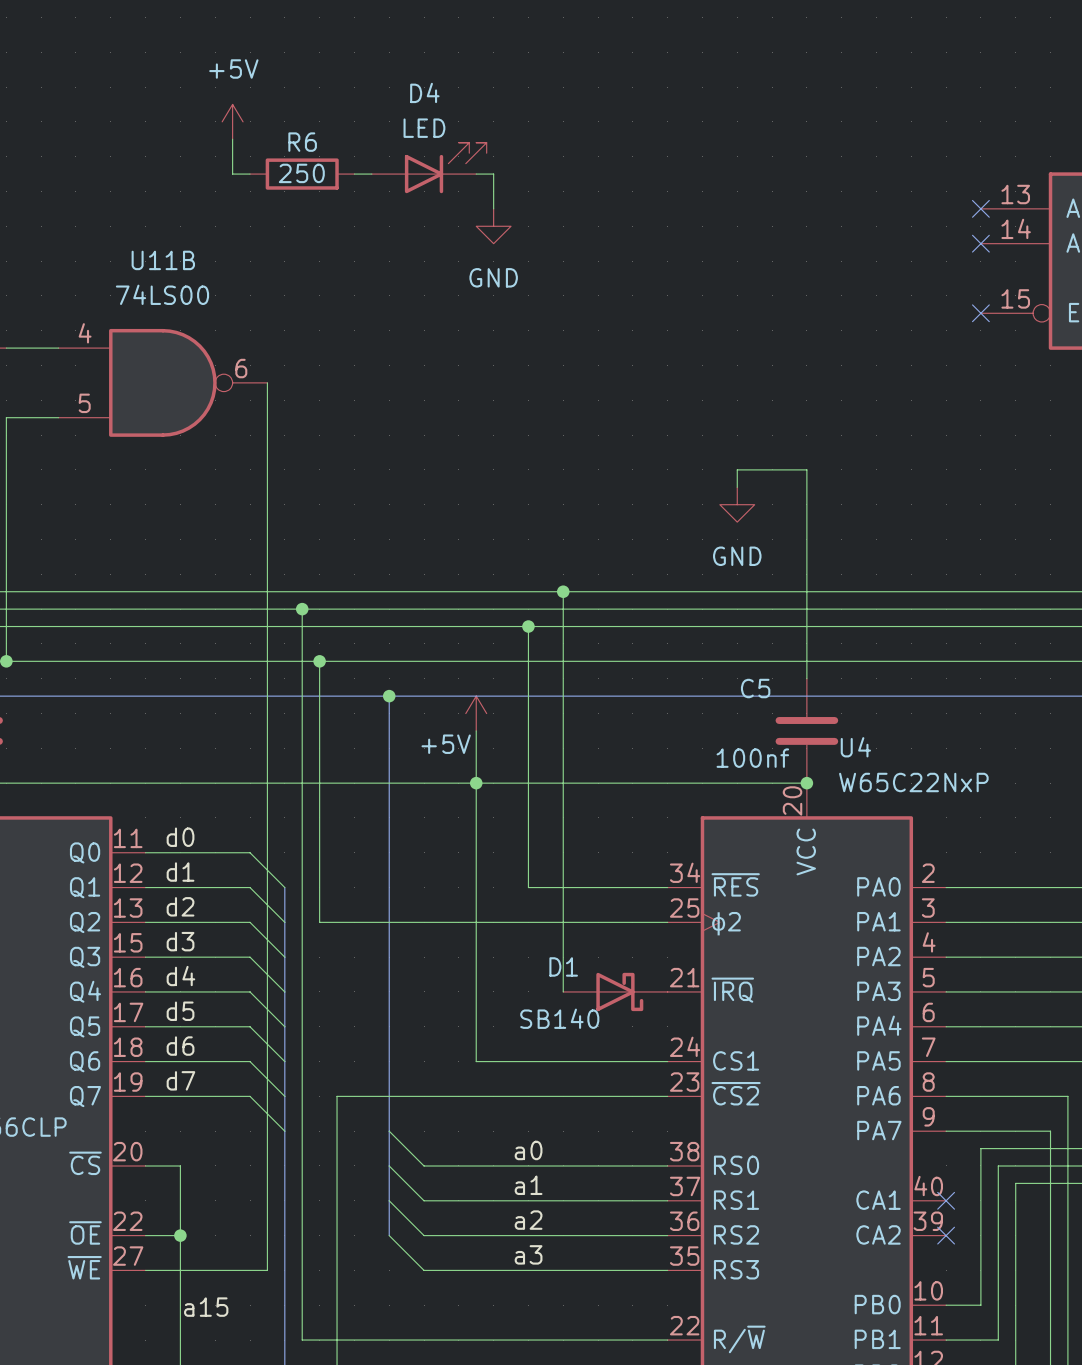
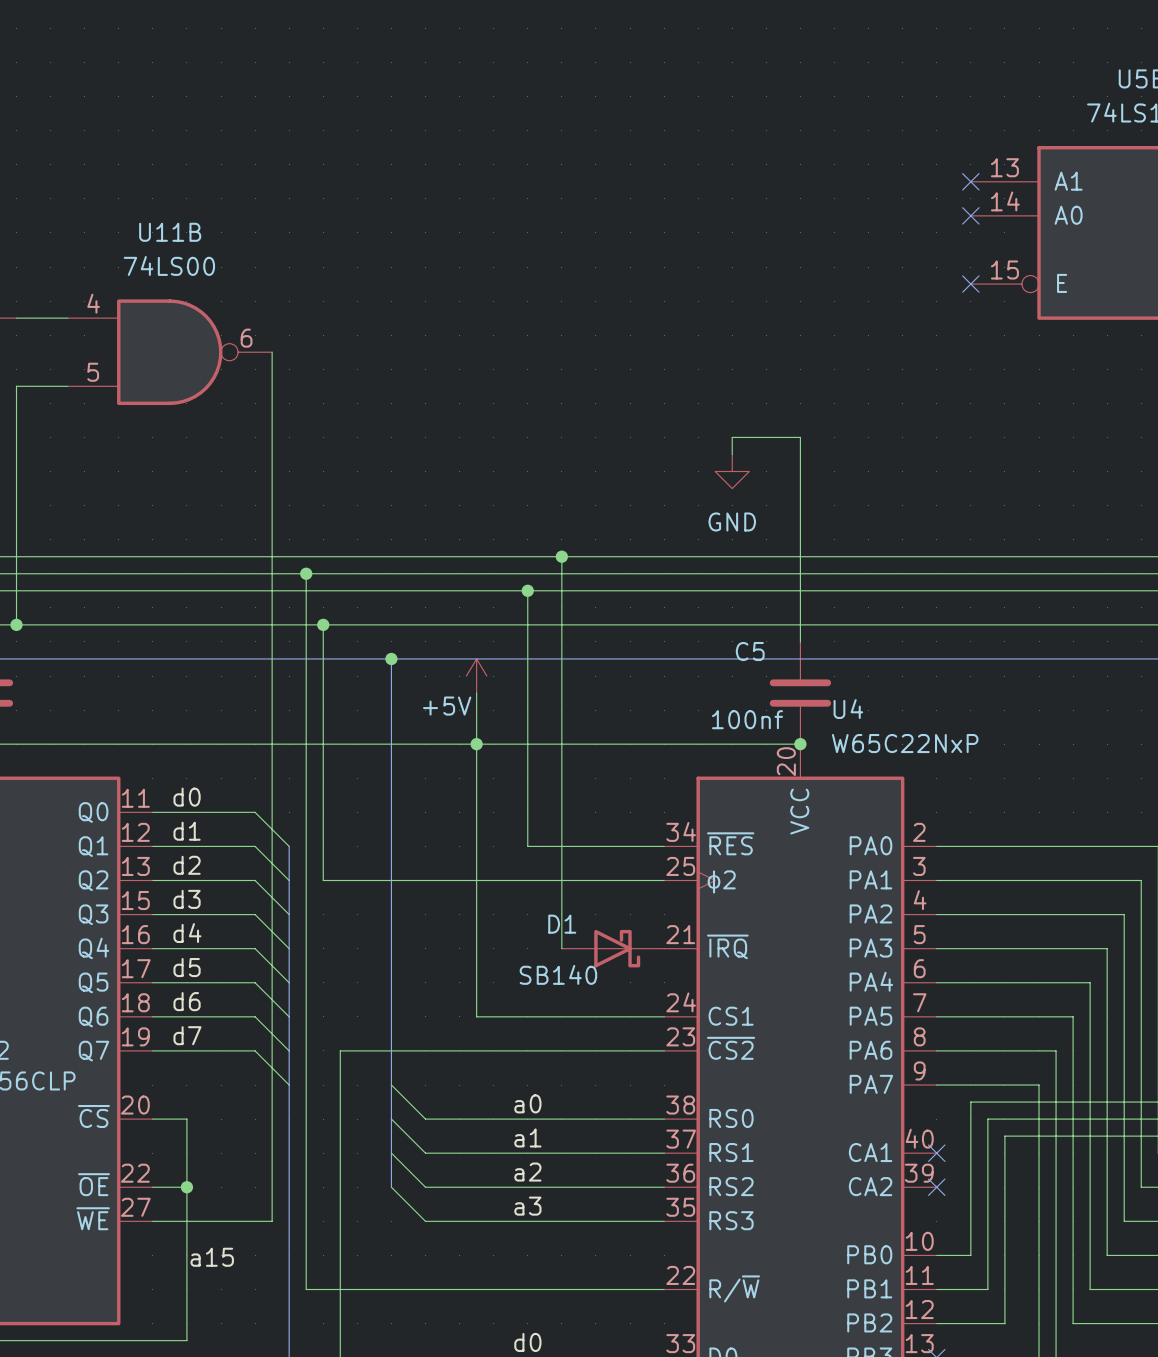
power symbol: +5V (232, 121) -> none
wire: (232, 139) (232, 174) (250, 174) -> none
D4: LED (429, 167) -> none
R6: 250 (302, 174) -> none
wire: (354, 174) (371, 174) -> none
wire: (476, 174) (493, 174) (493, 208) -> none
power symbol: GND (493, 226) -> none

